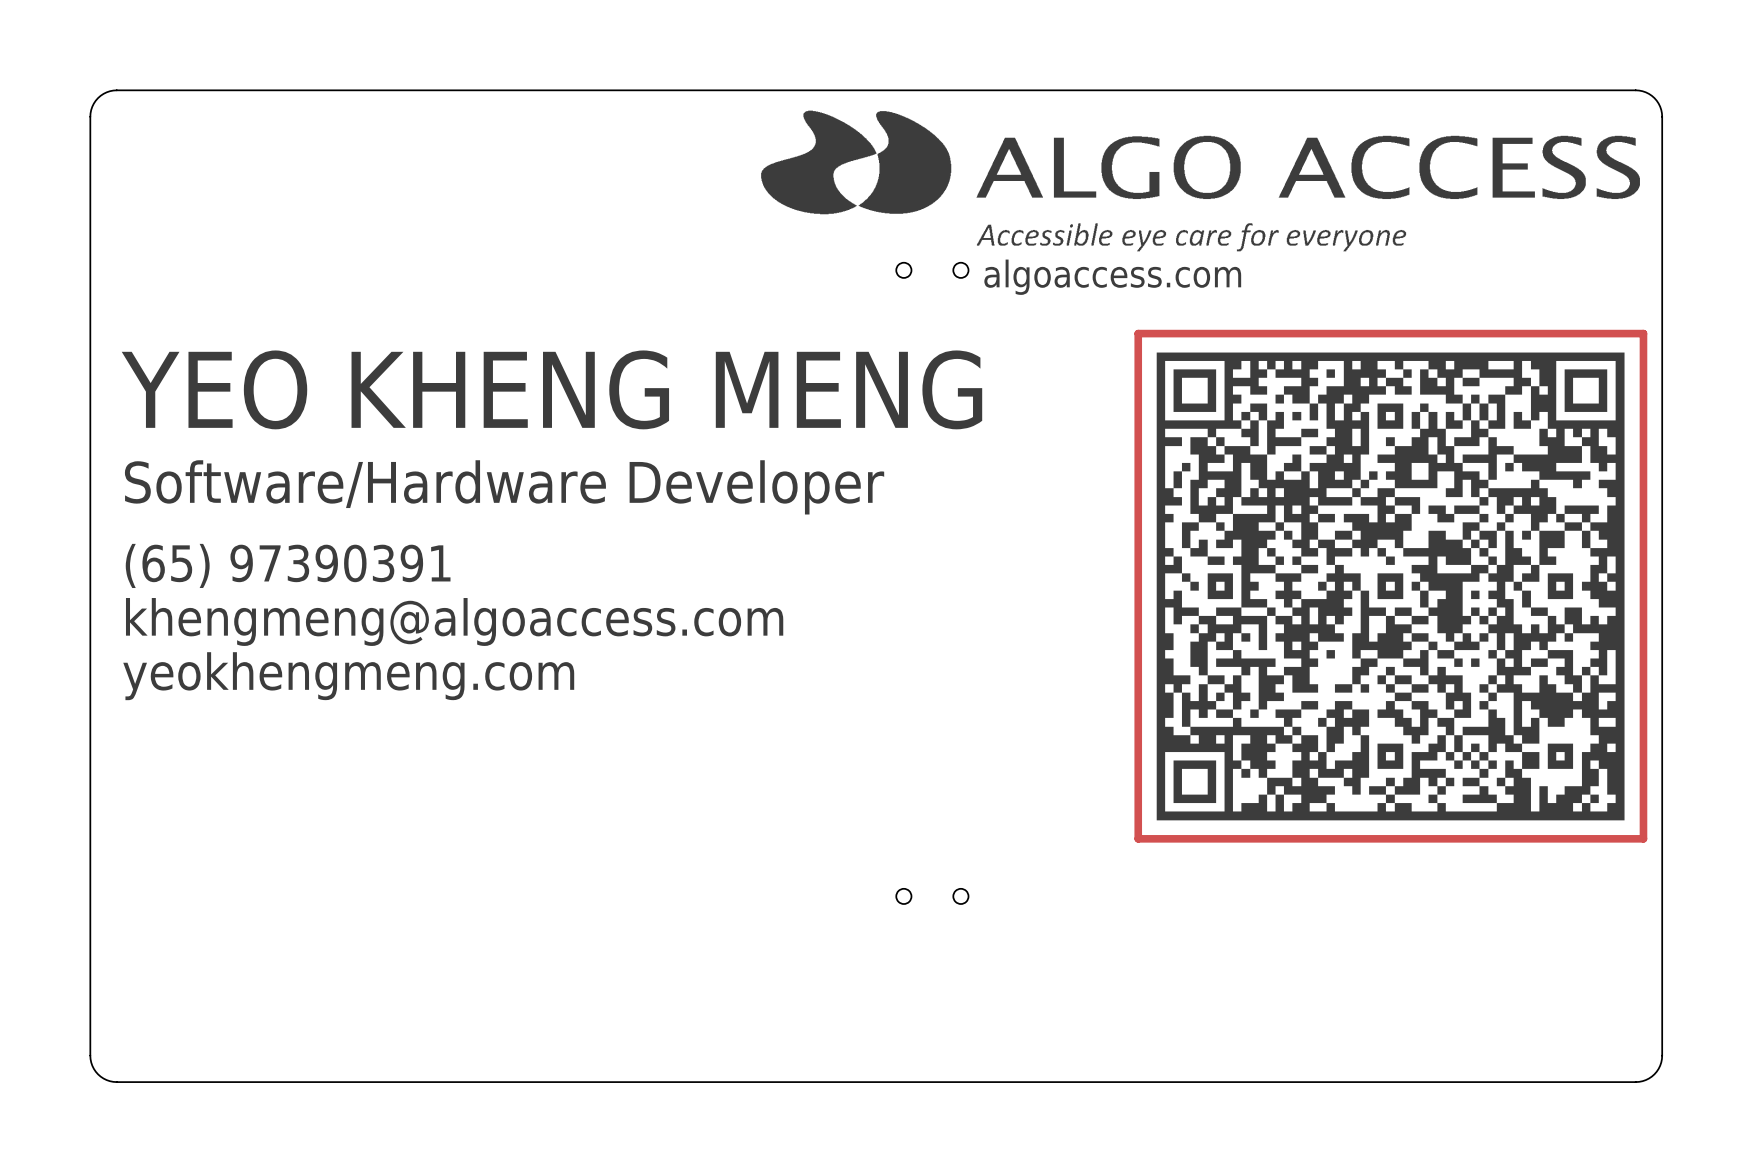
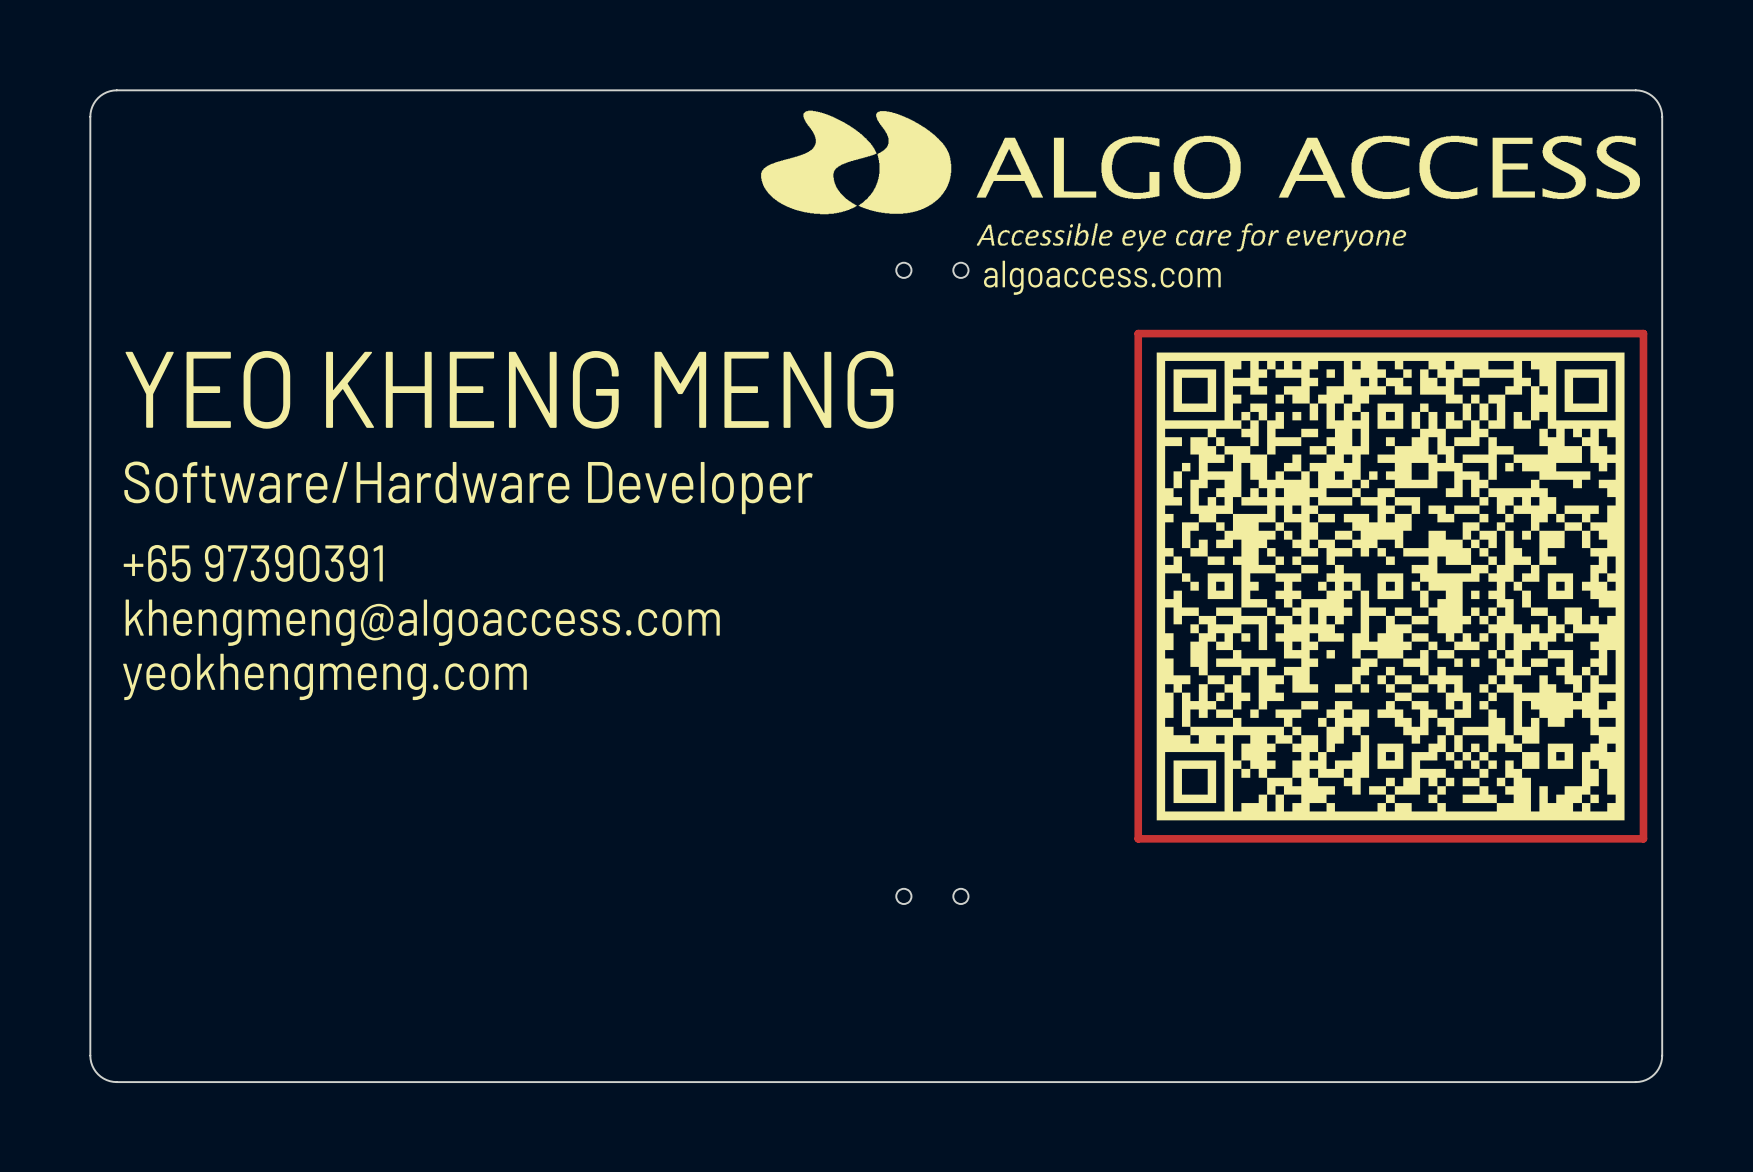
text: (65) 97390391 (288, 565) -> +65 97390391 (253, 563)

